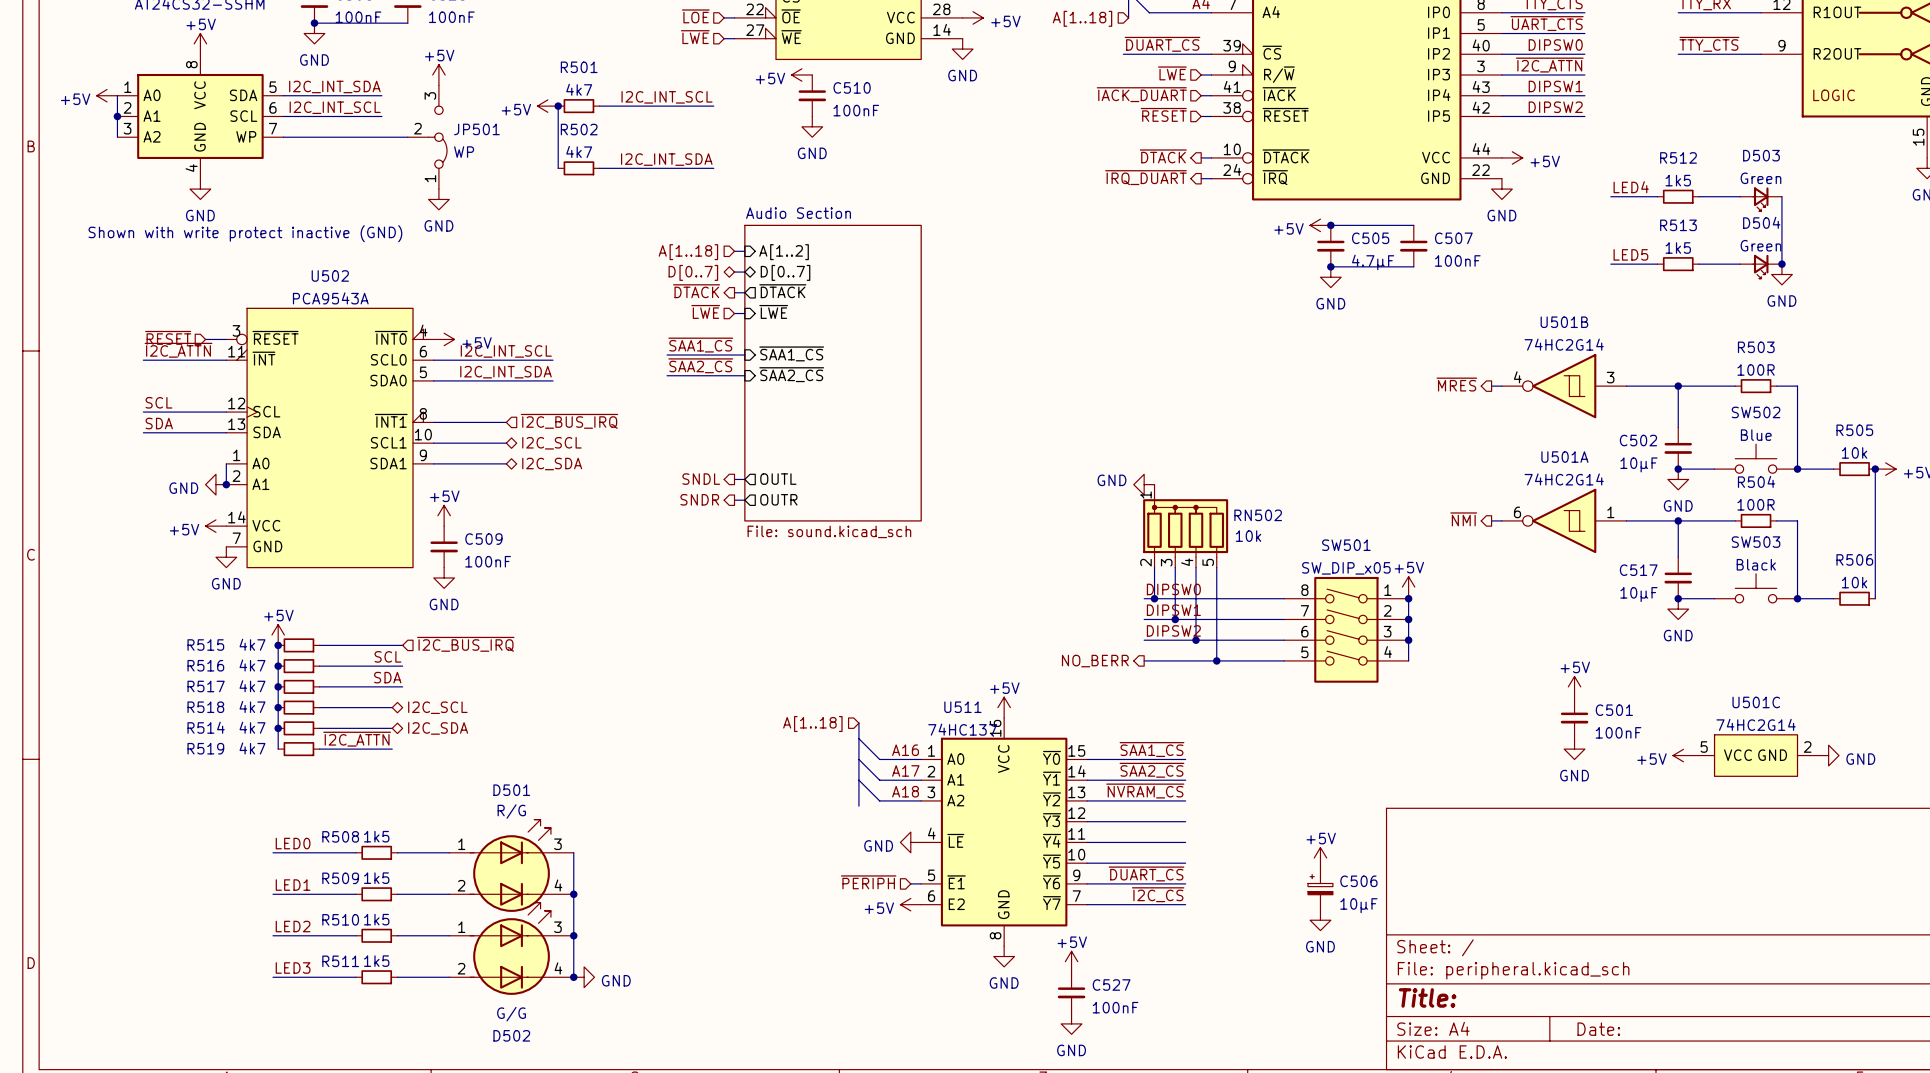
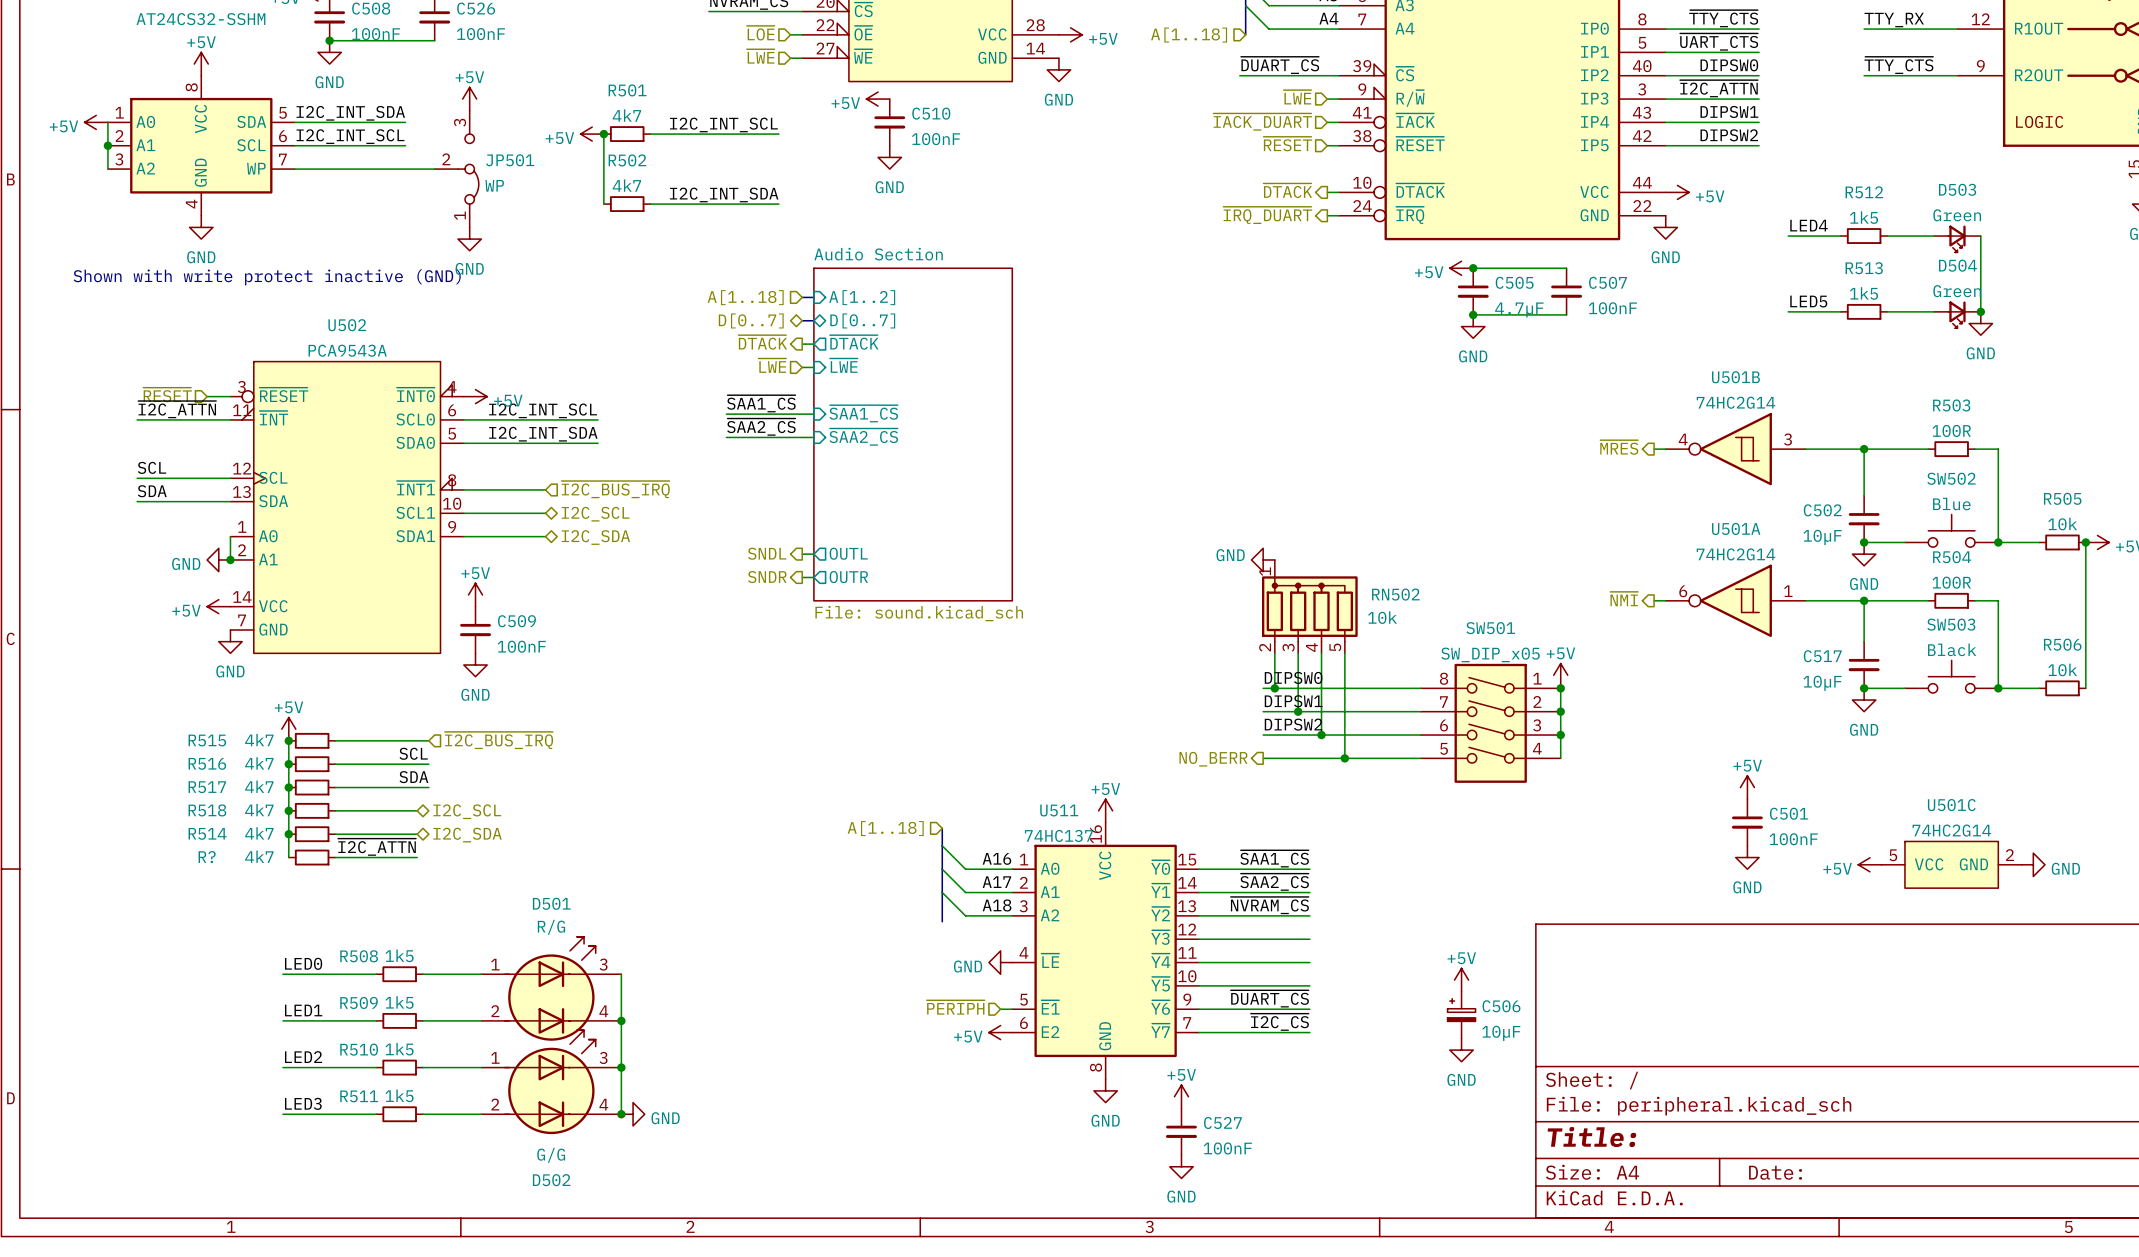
R519 name: R519 (205, 748) -> R? (207, 857)

